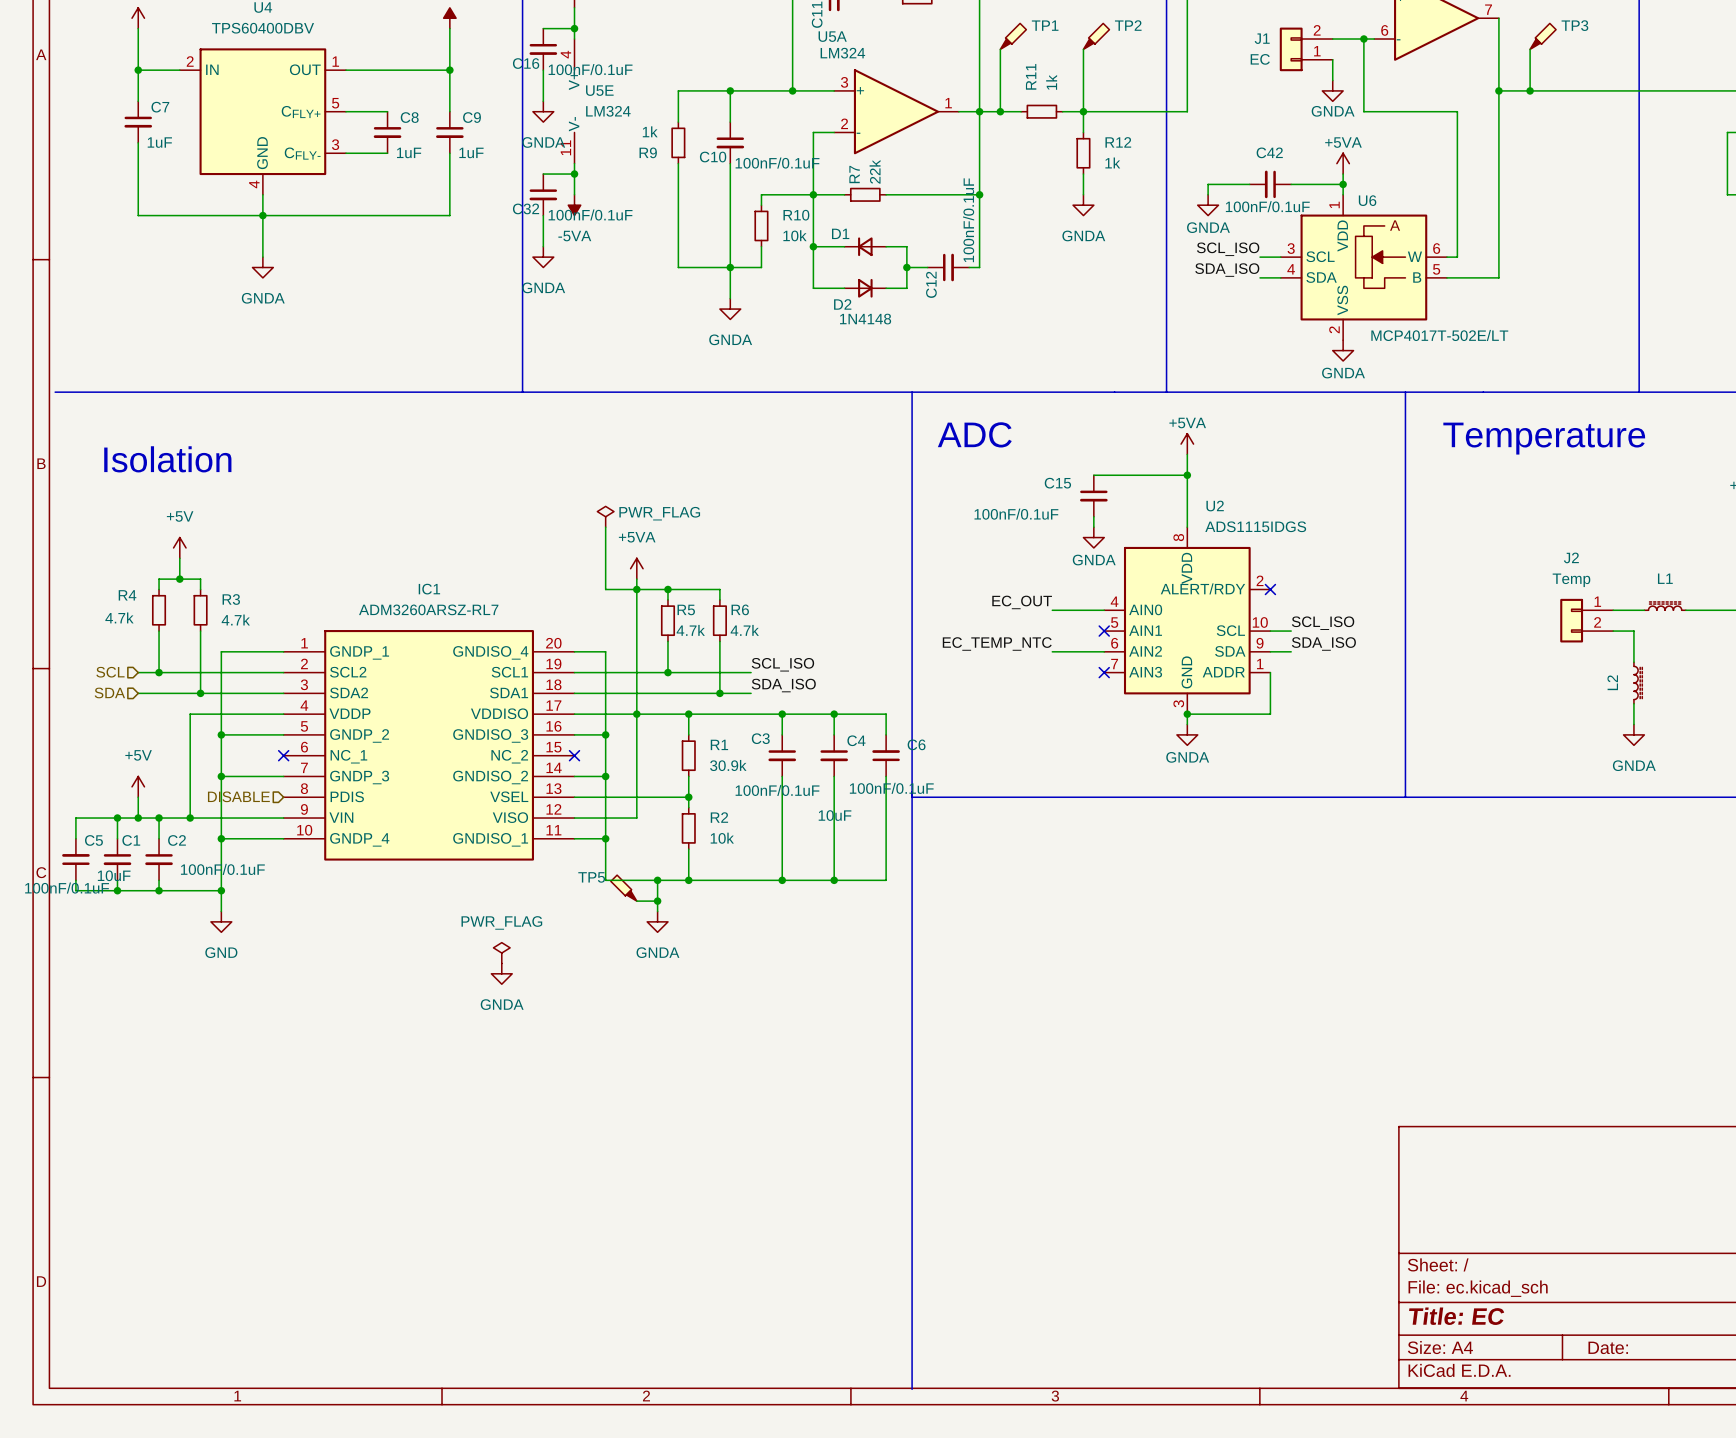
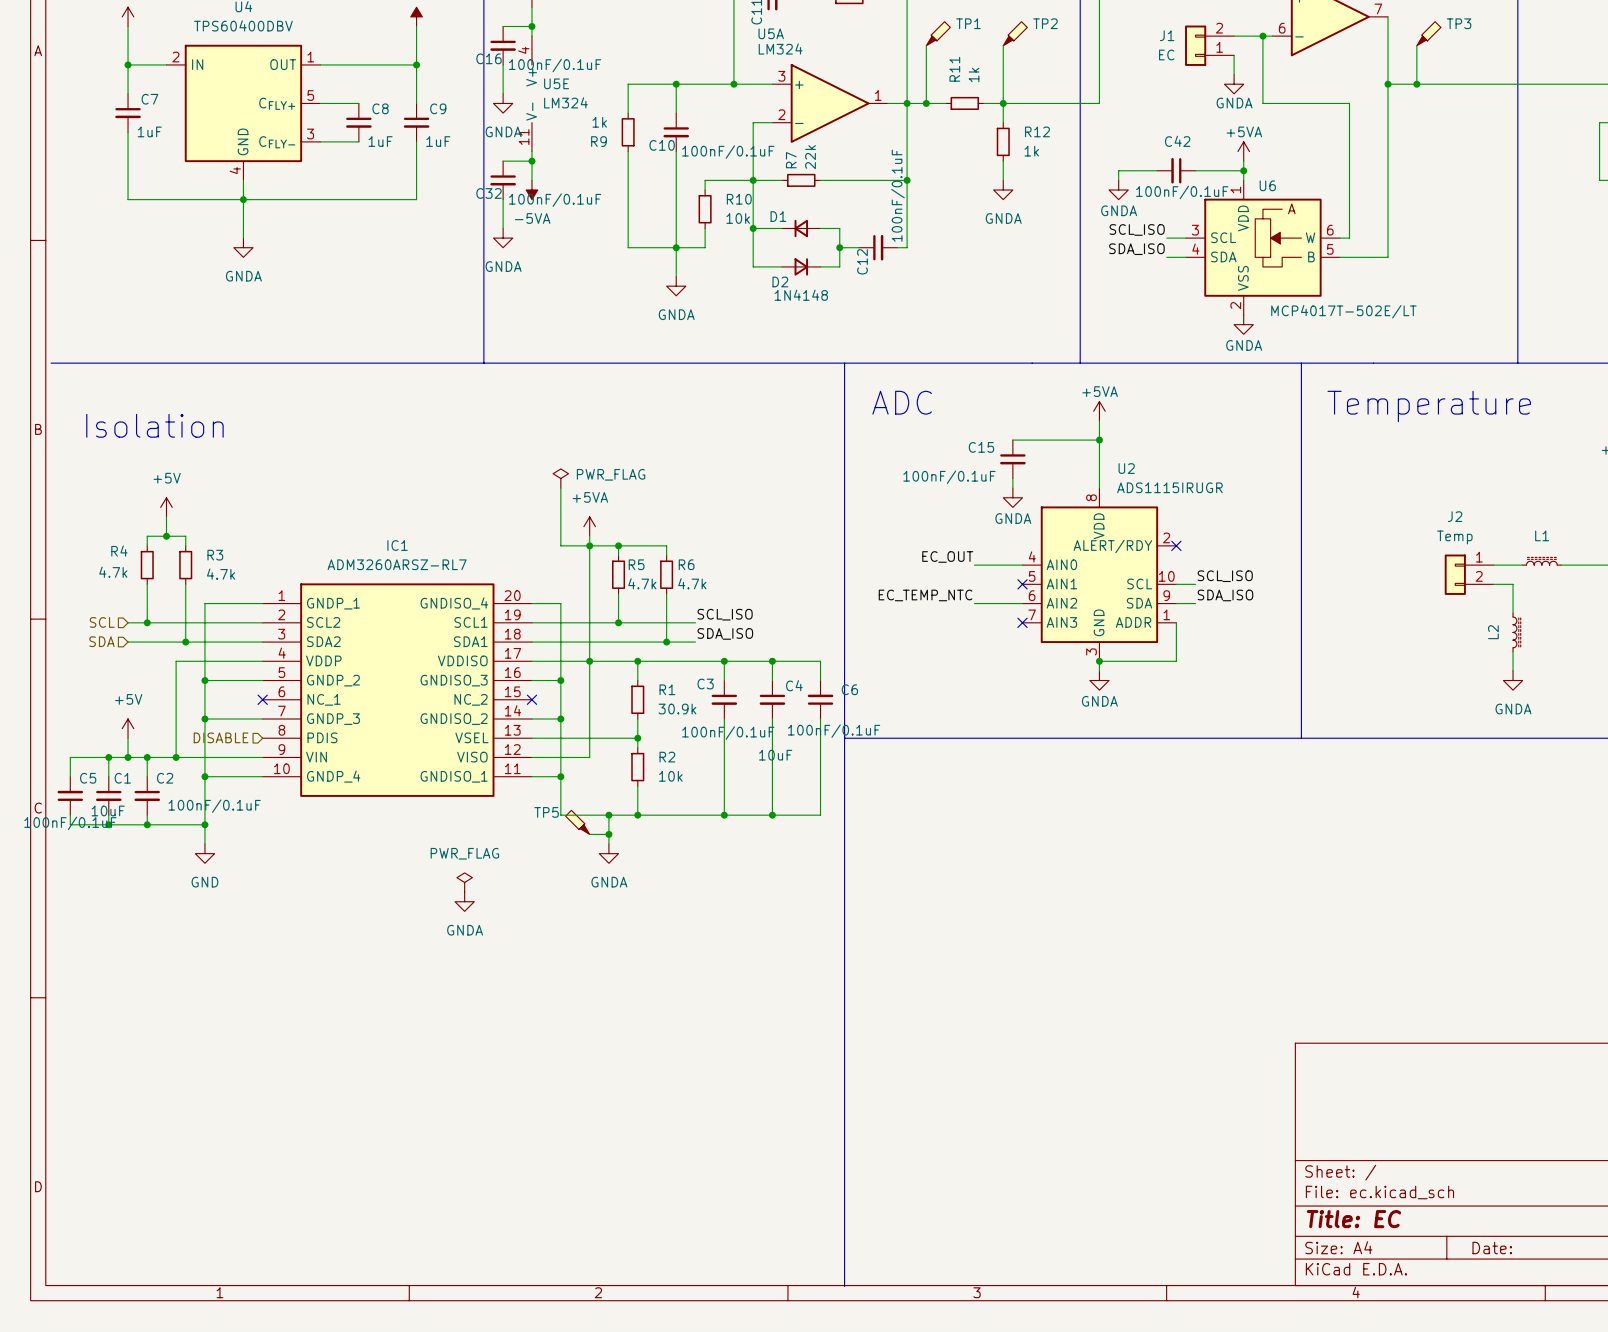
U2 value: ADS1115IDGS (1255, 526) -> ADS1115IRUGR (1169, 487)

